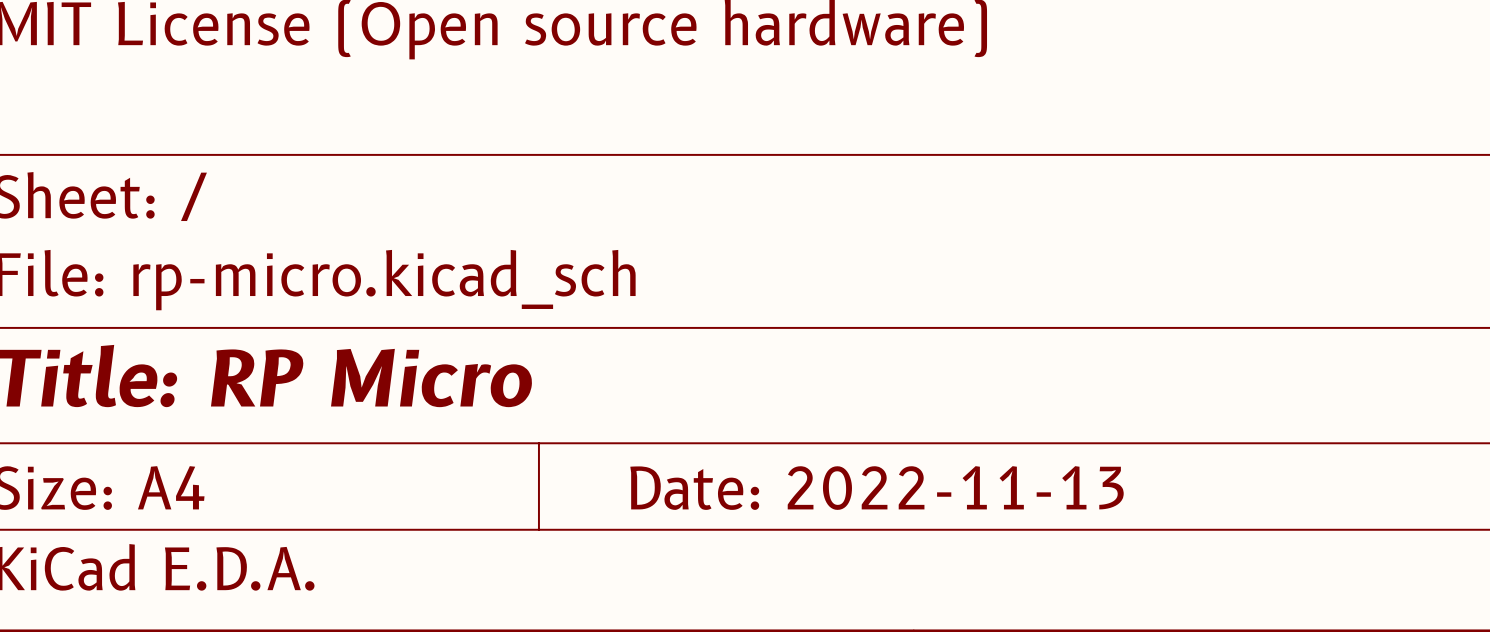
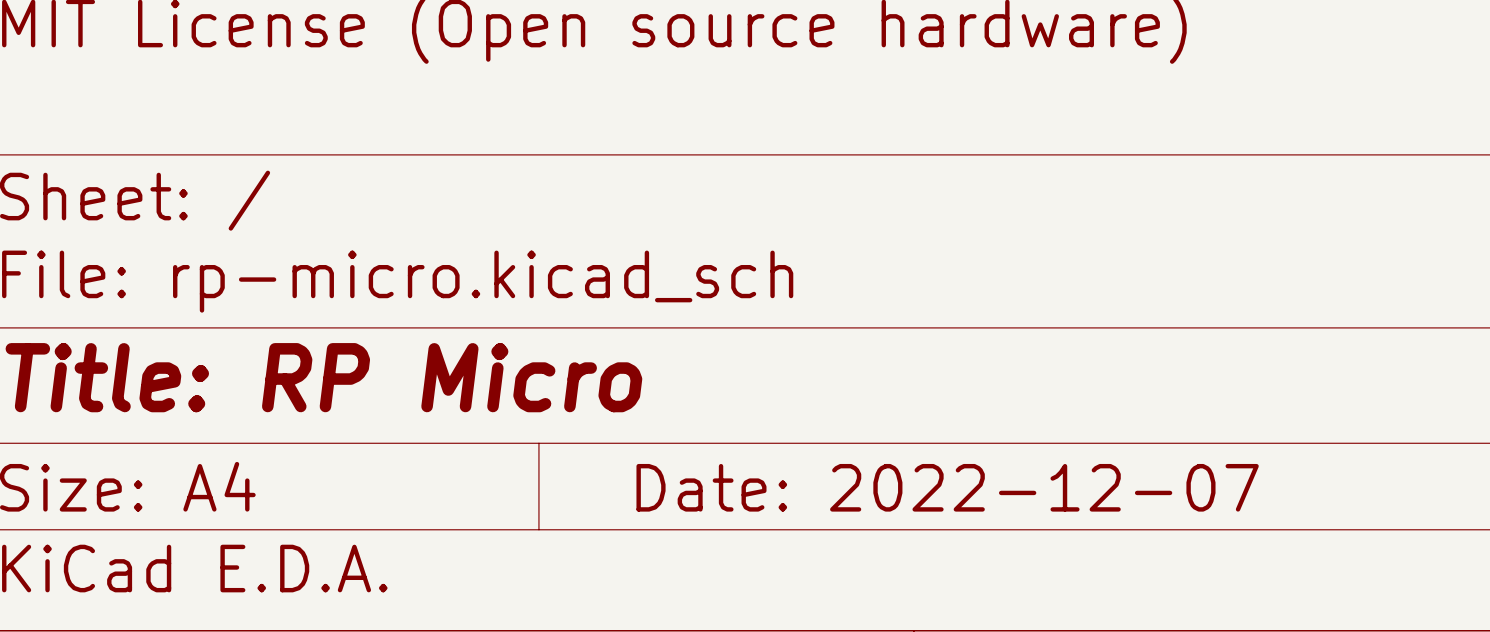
title block: Date: 2022-11-13 (877, 488) -> Date: 2022-12-07 (947, 487)

